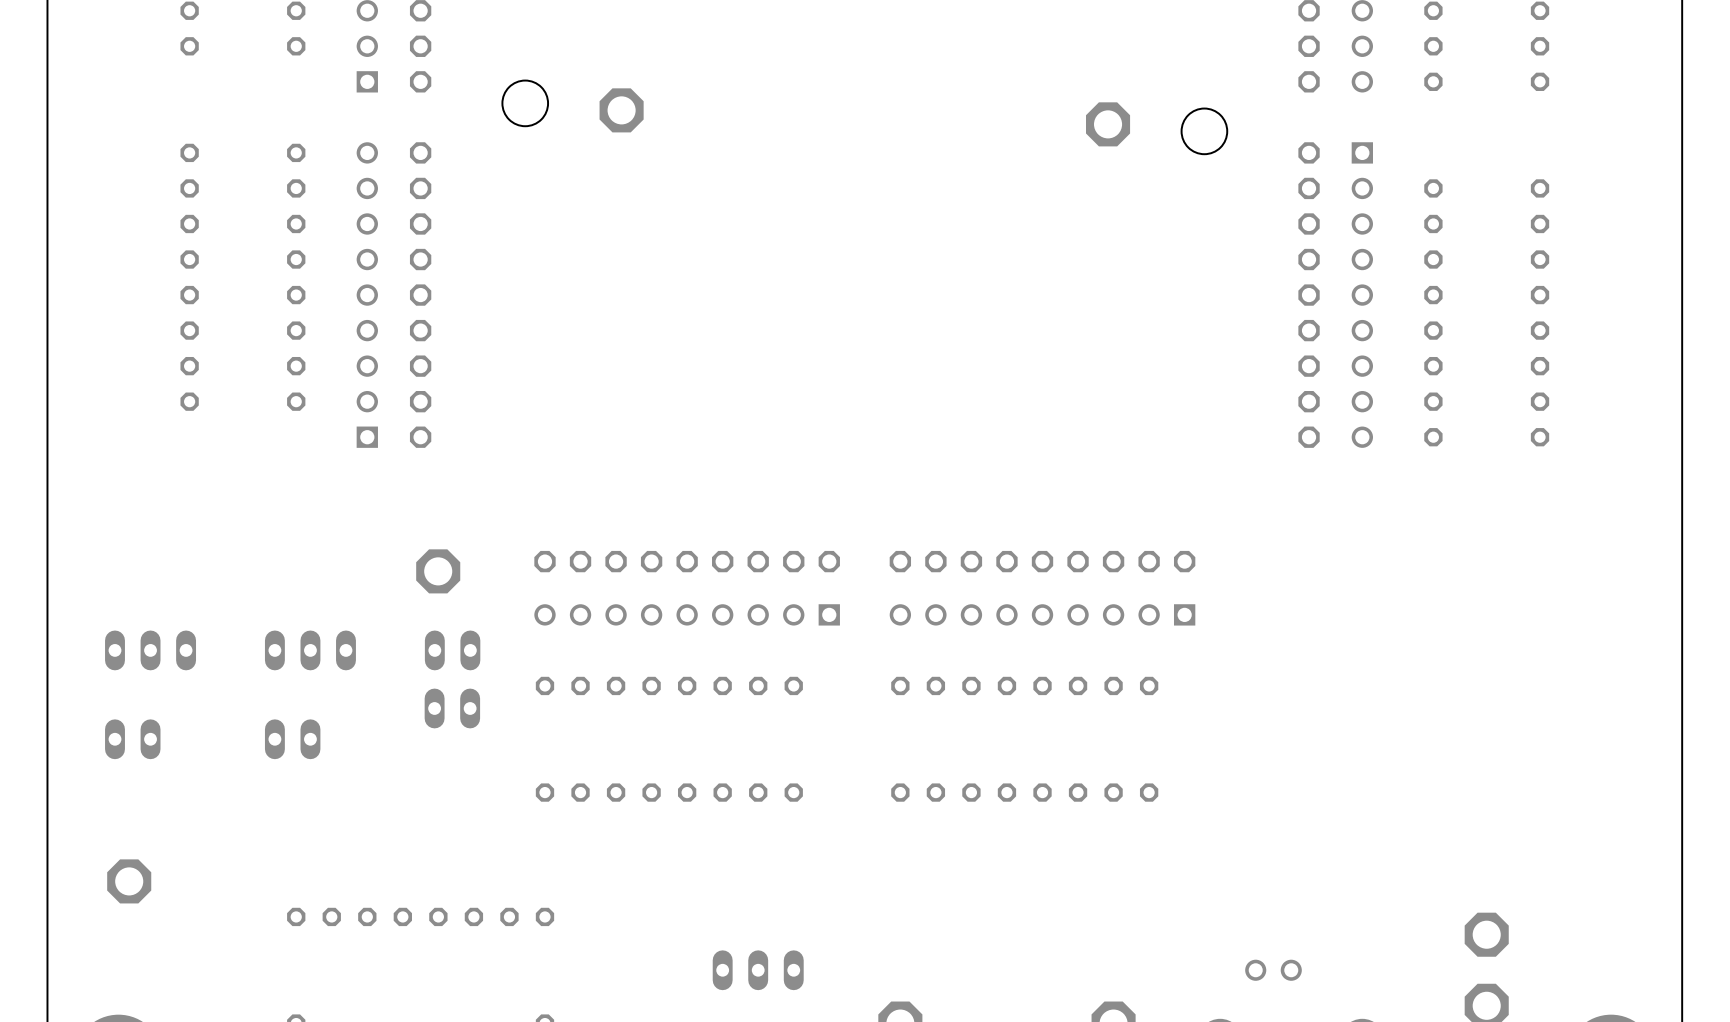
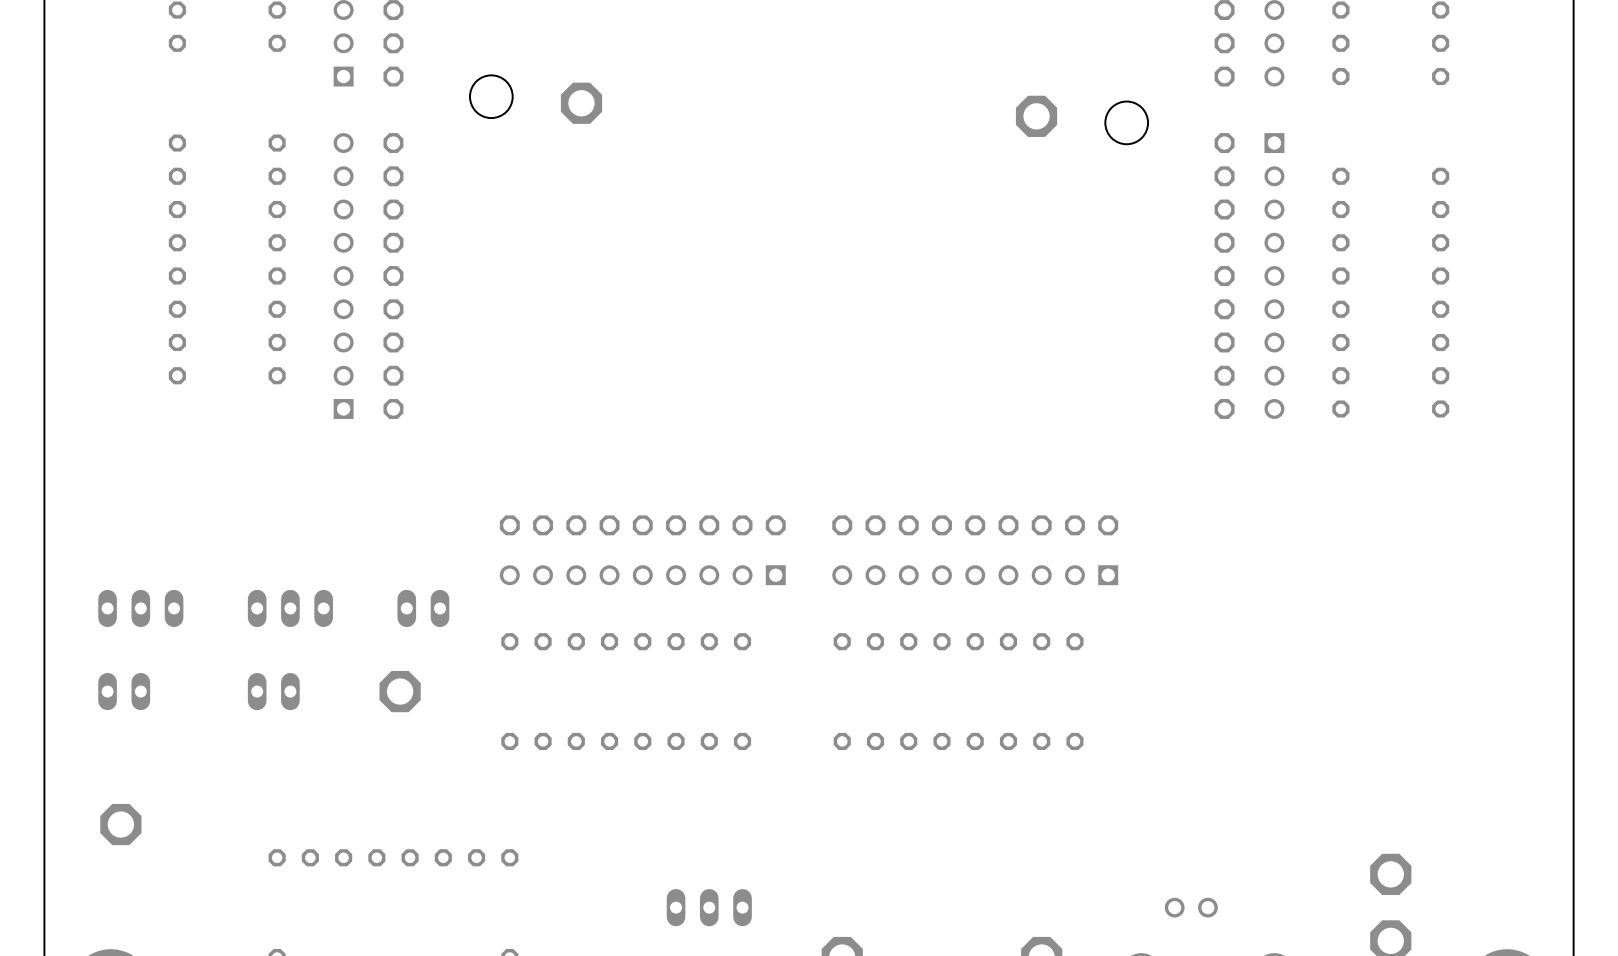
part position: (438, 571) -> (400, 691)
part: (452, 708) -> none

